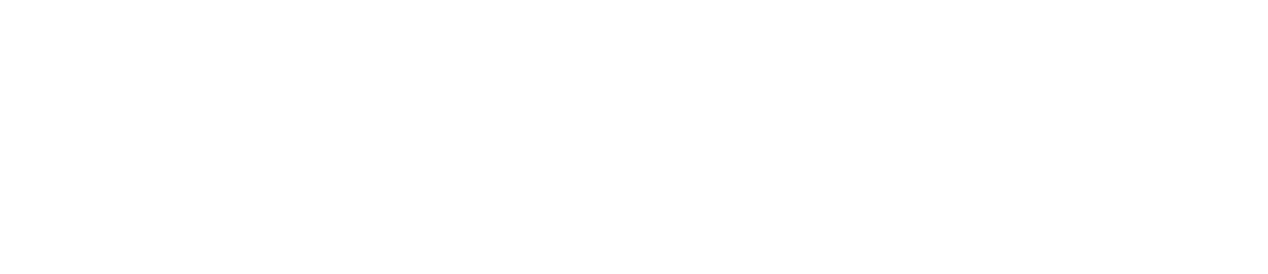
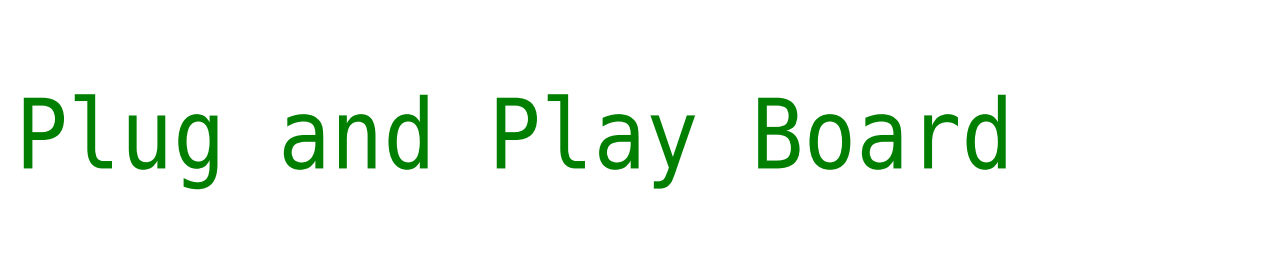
text: none -> Plug and Play Board (514, 141)

